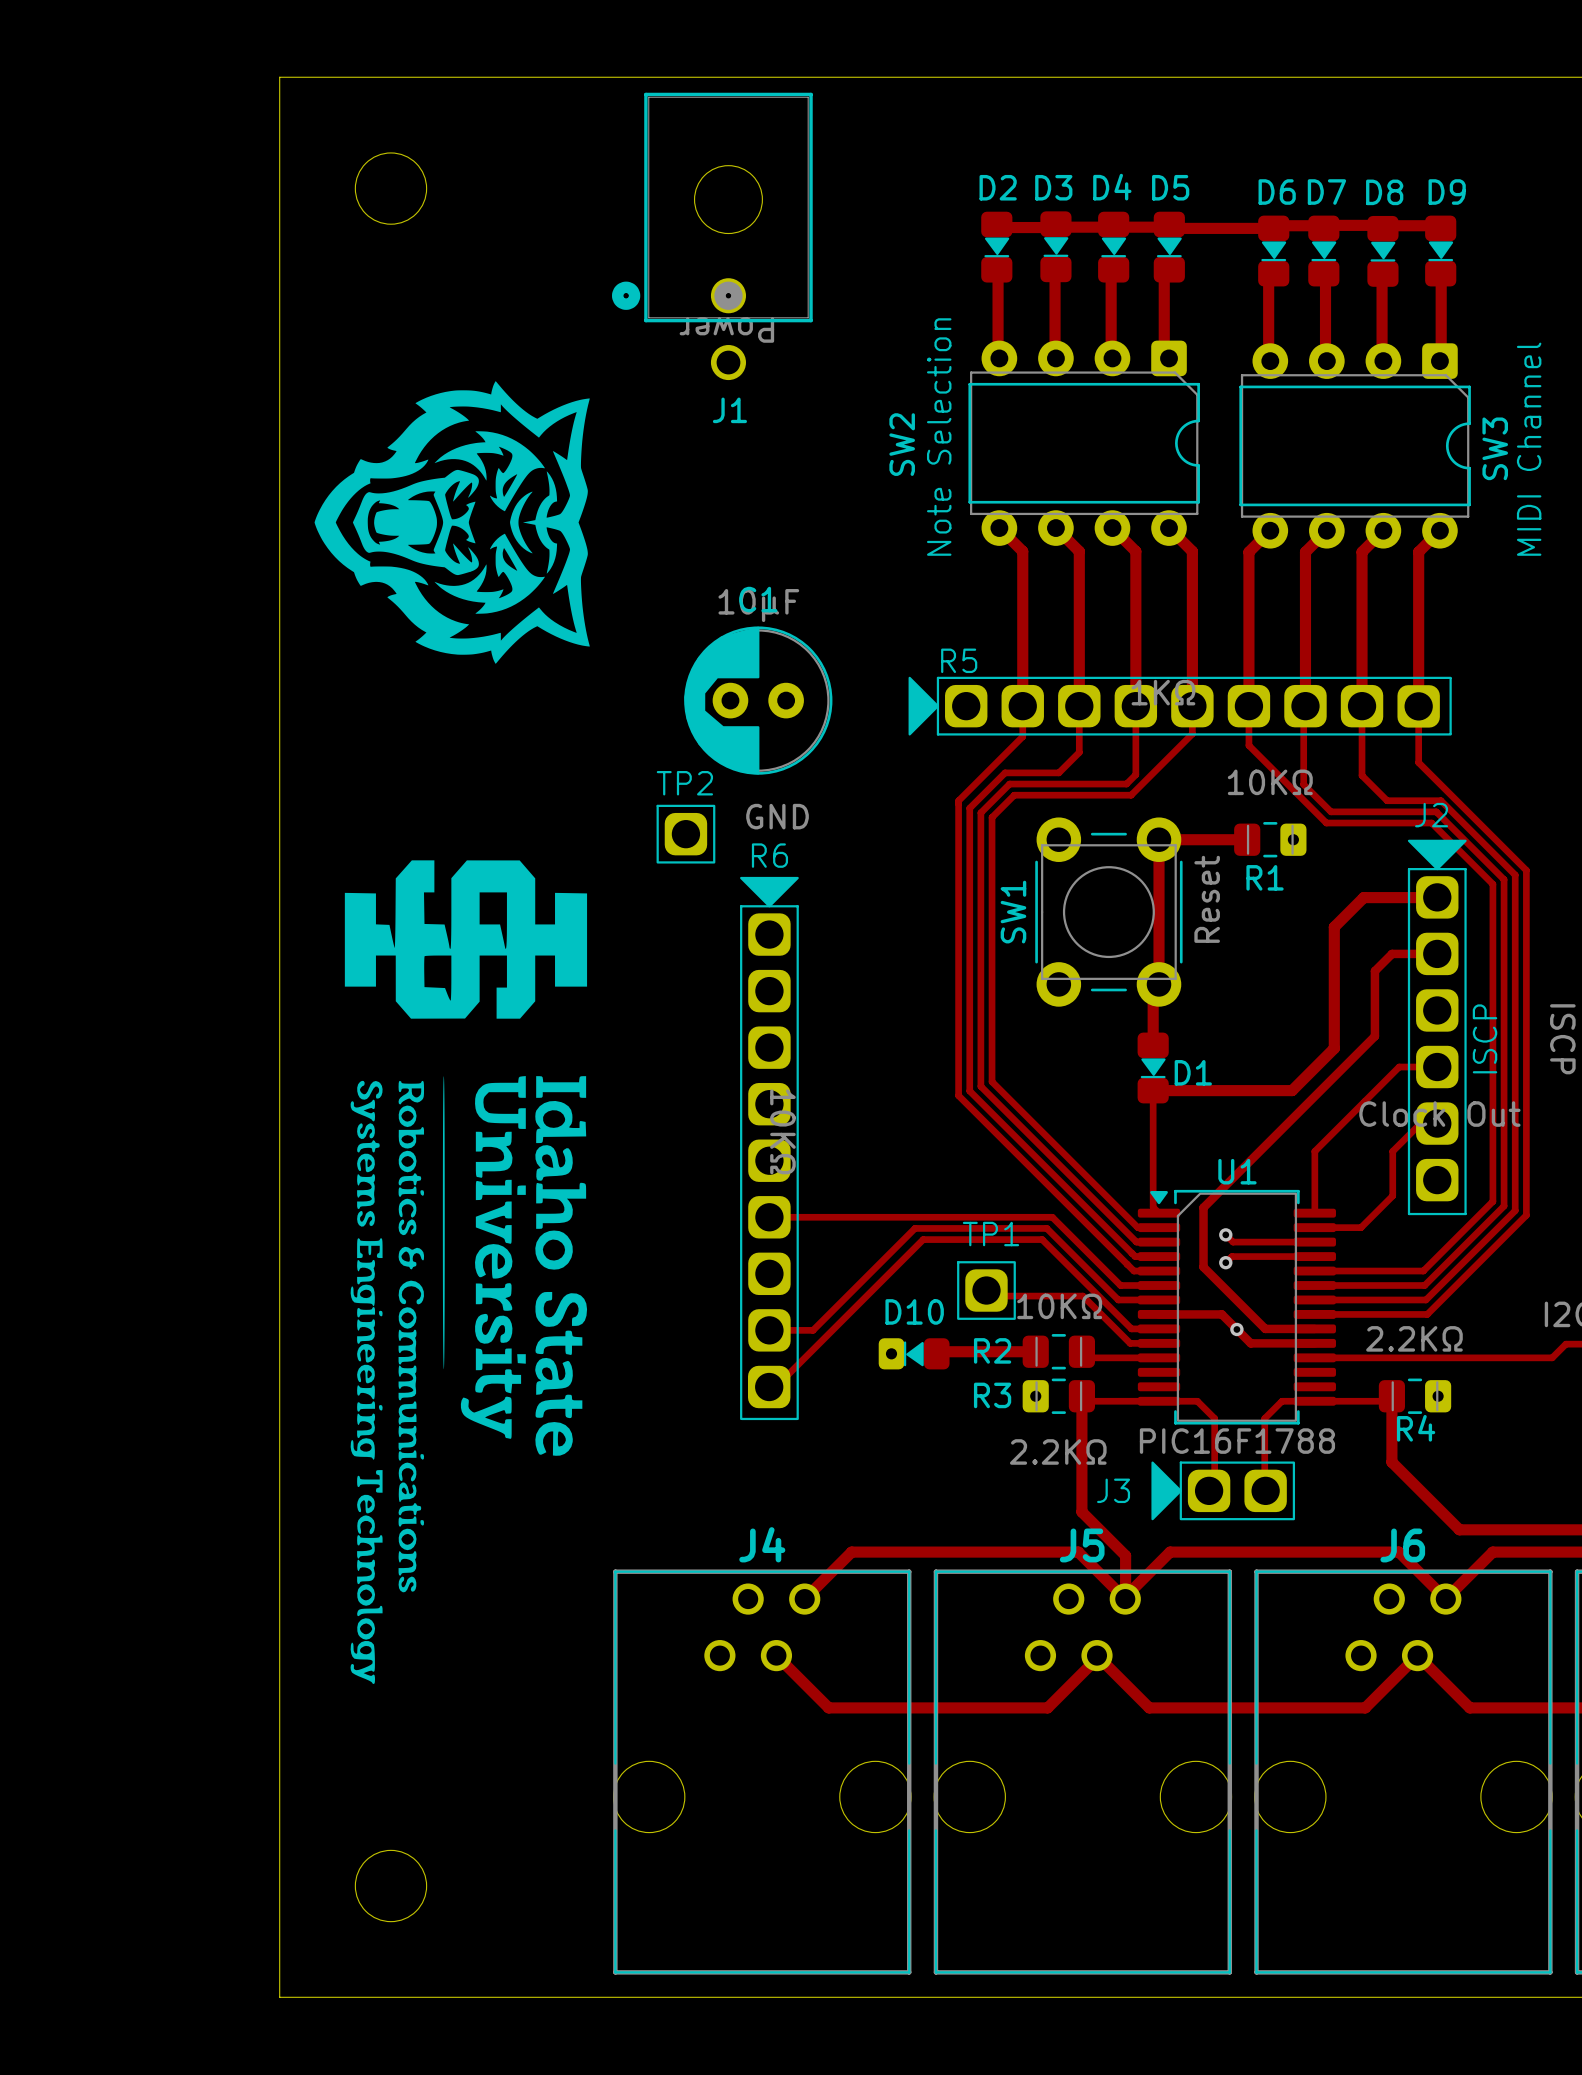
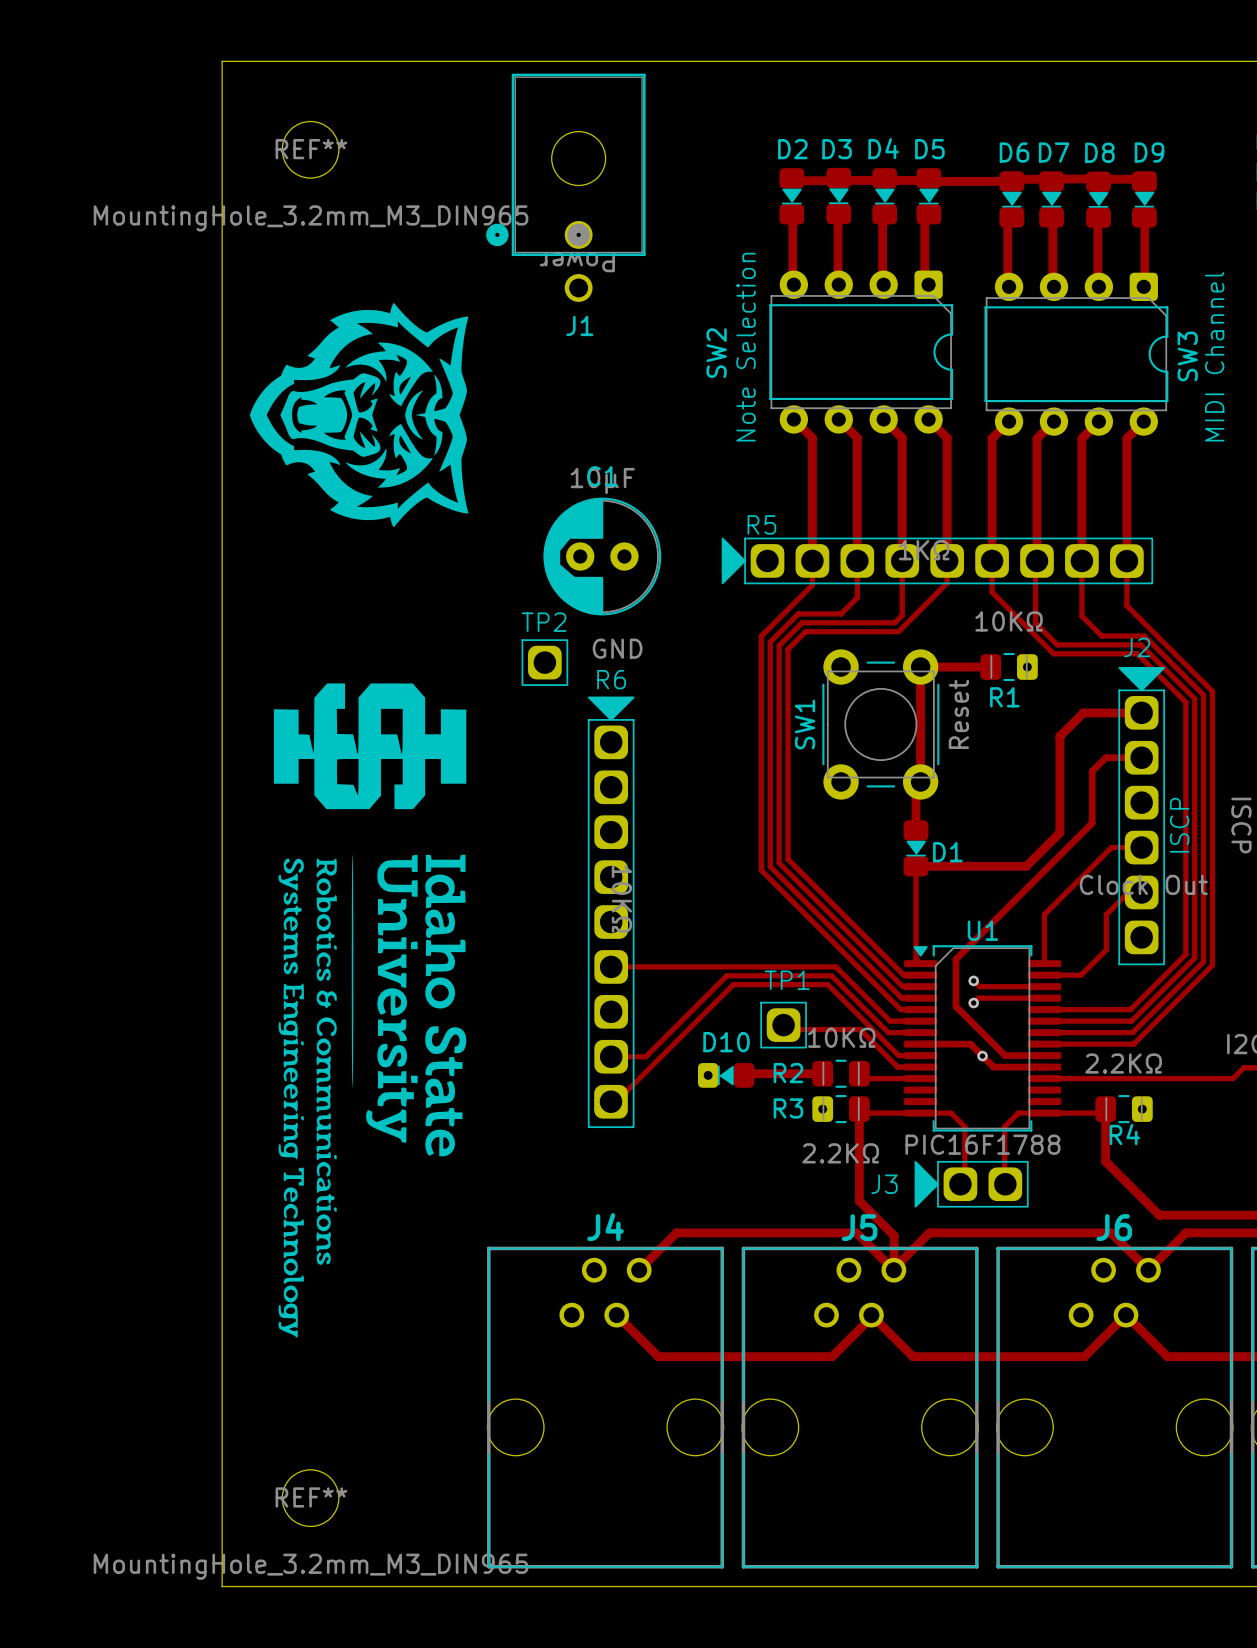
REF** name: none -> REF** (311, 149)
REF** value: none -> MountingHole_3.2mm_M3_DIN965 (310, 218)
REF** name: none -> REF** (311, 1497)
REF** value: none -> MountingHole_3.2mm_M3_DIN965 (310, 1566)

